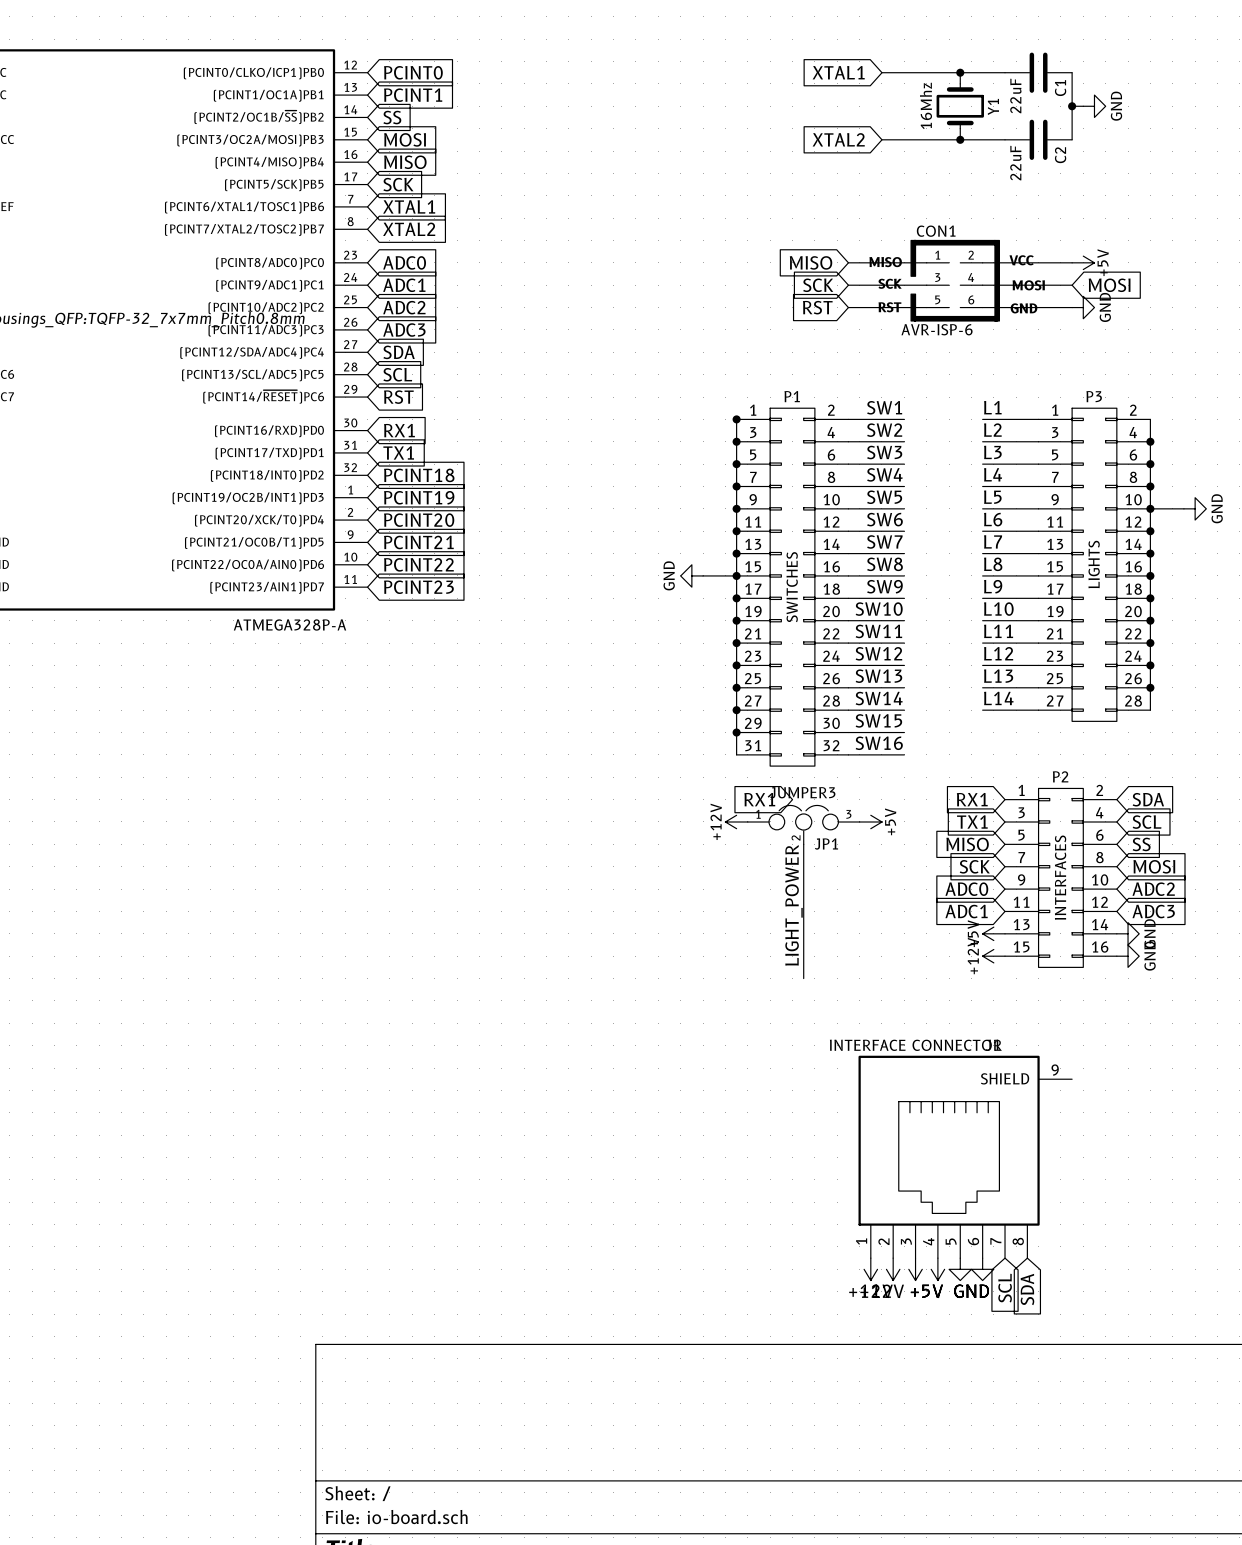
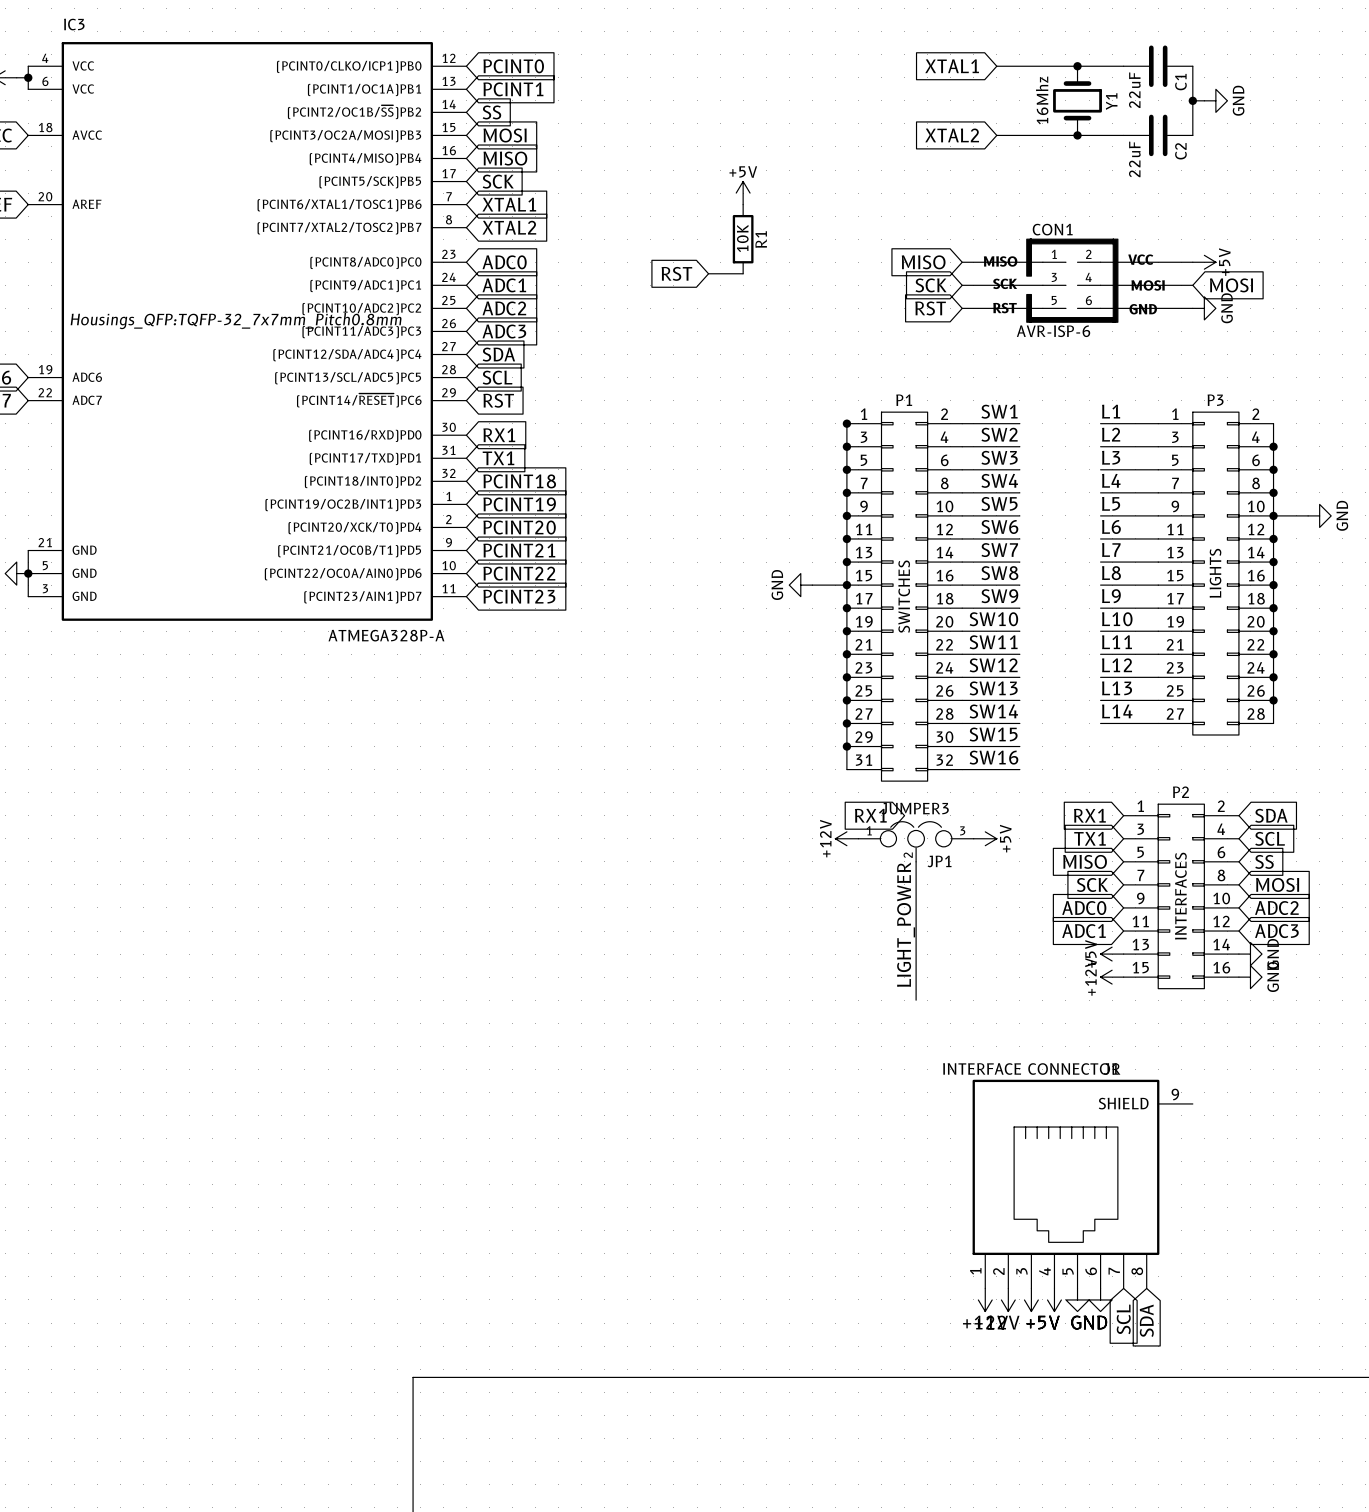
power symbol: none -> +5V (743, 193)
R1: none -> 10K (743, 239)
global label: none -> RST (676, 273)
wire: none -> (708, 273) (743, 273)

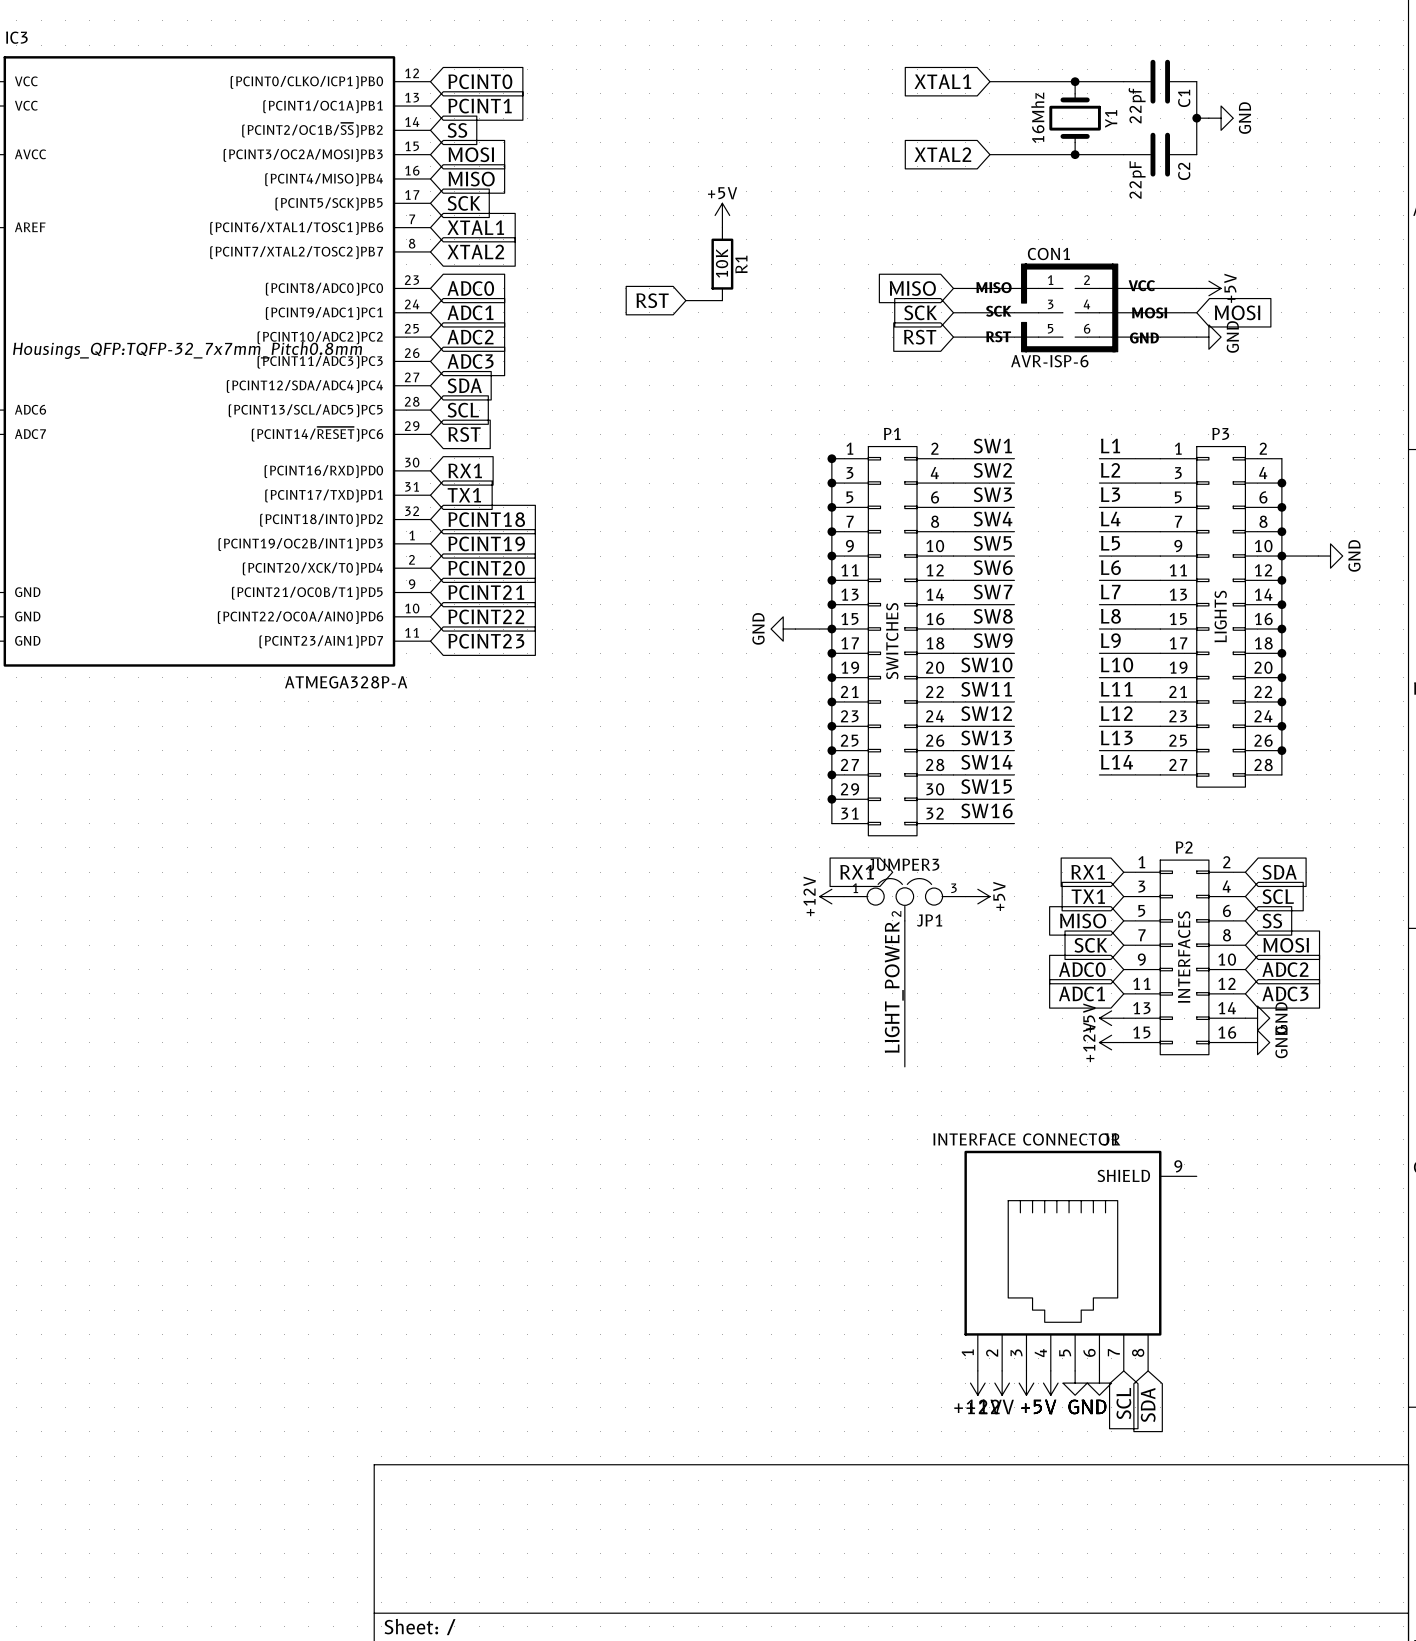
C1 value: 22uF (1134, 90) -> 22pf (1137, 105)
C2 value: 22uF (1134, 159) -> 22pF (1137, 179)

